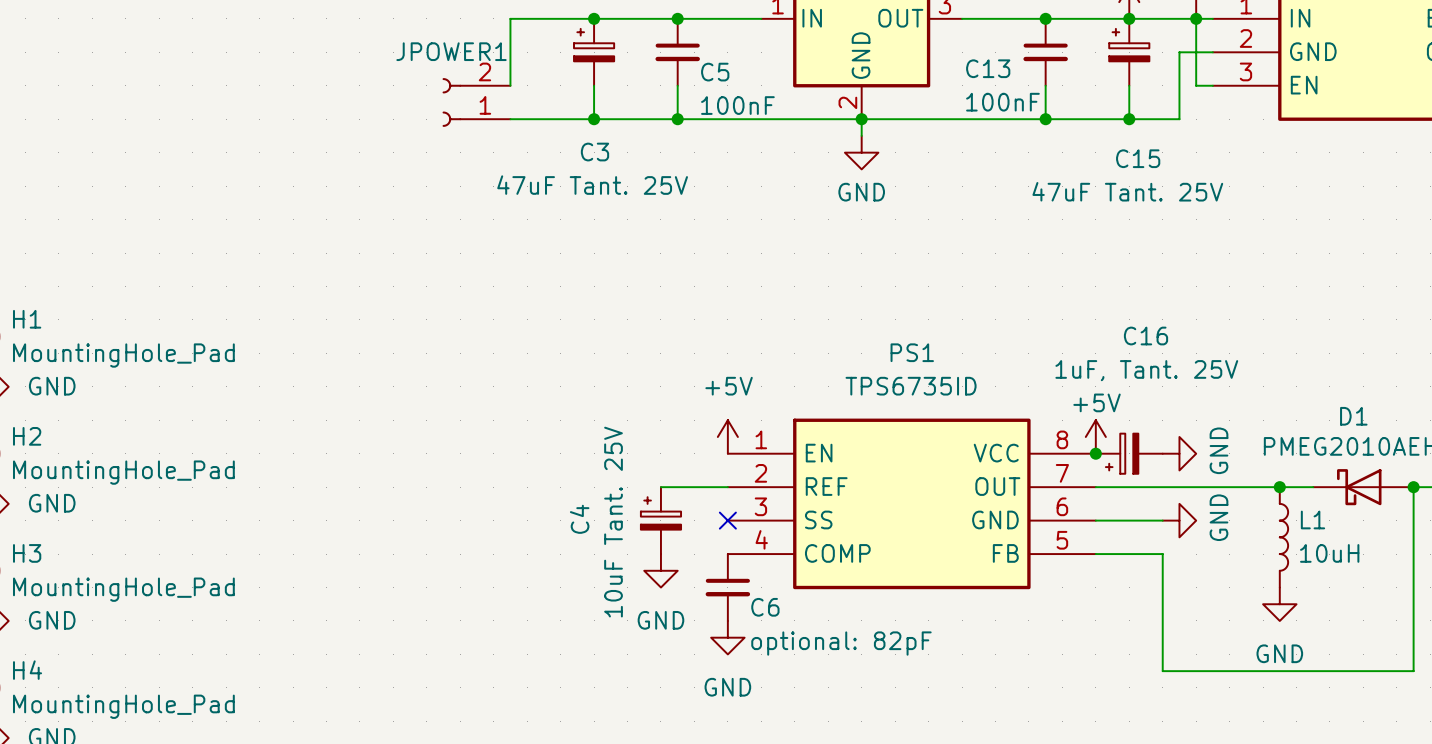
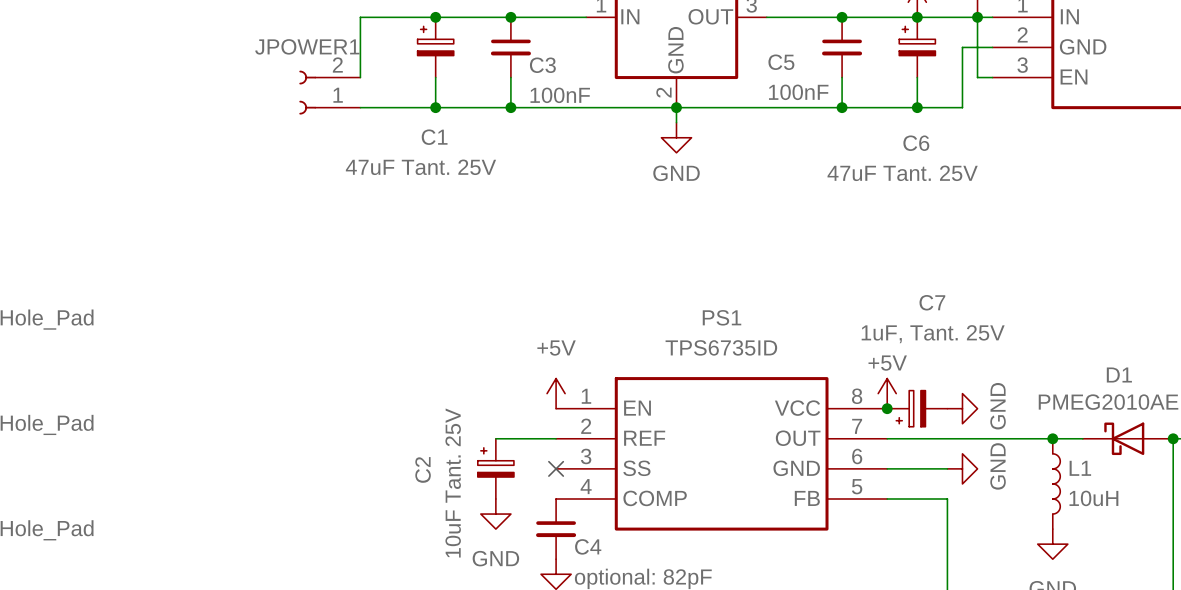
C13 name: C13 (988, 68) -> C5 (781, 62)
C5 name: C5 (715, 72) -> C3 (542, 65)
C3 name: C3 (594, 152) -> C1 (434, 137)
C15 name: C15 (1138, 158) -> C6 (916, 143)
C16 name: C16 (1146, 336) -> C7 (932, 302)
C4 name: C4 (579, 519) -> C2 (423, 469)
C6 name: C6 (765, 607) -> C4 (588, 546)

